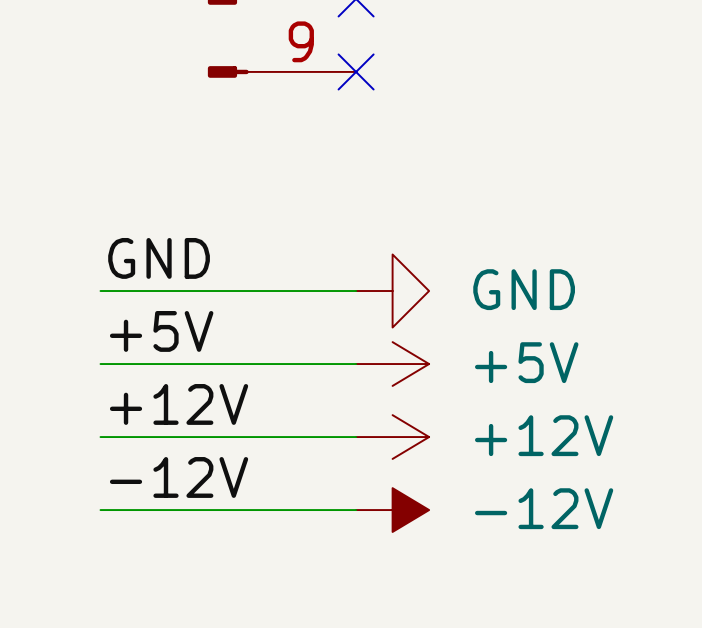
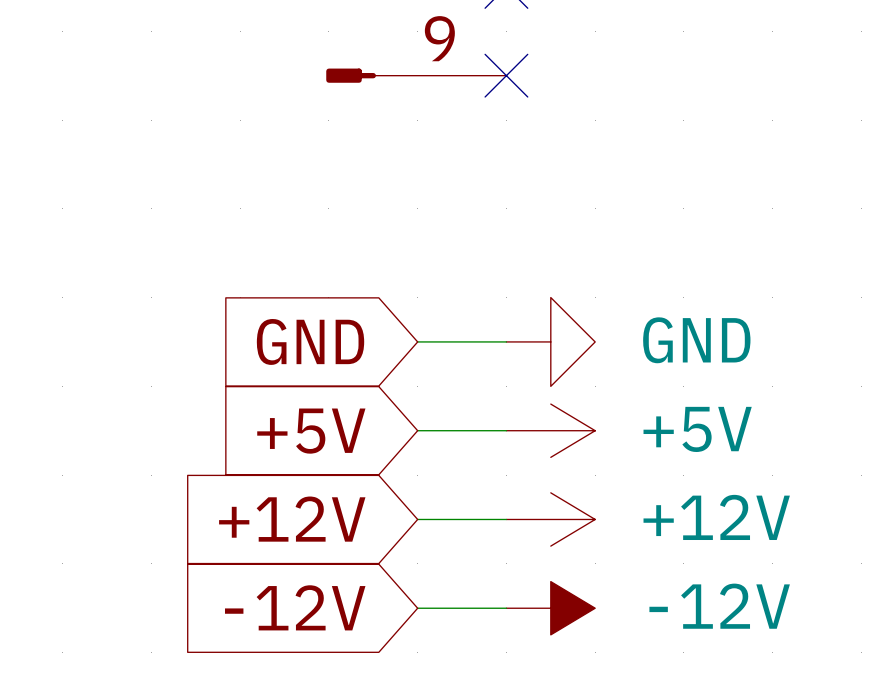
label: GND (159, 258) -> none
wire: (100, 291) (283, 291) -> none
global label: none -> GND (310, 341)
label: +5V (161, 331) -> none
wire: (100, 364) (283, 364) -> none
global label: none -> +5V (311, 431)
label: +12V (179, 404) -> none
wire: (100, 437) (283, 437) -> none
global label: none -> +12V (292, 519)
label: -12V (179, 477) -> none
wire: (100, 510) (283, 510) -> none
global label: none -> -12V (295, 607)

